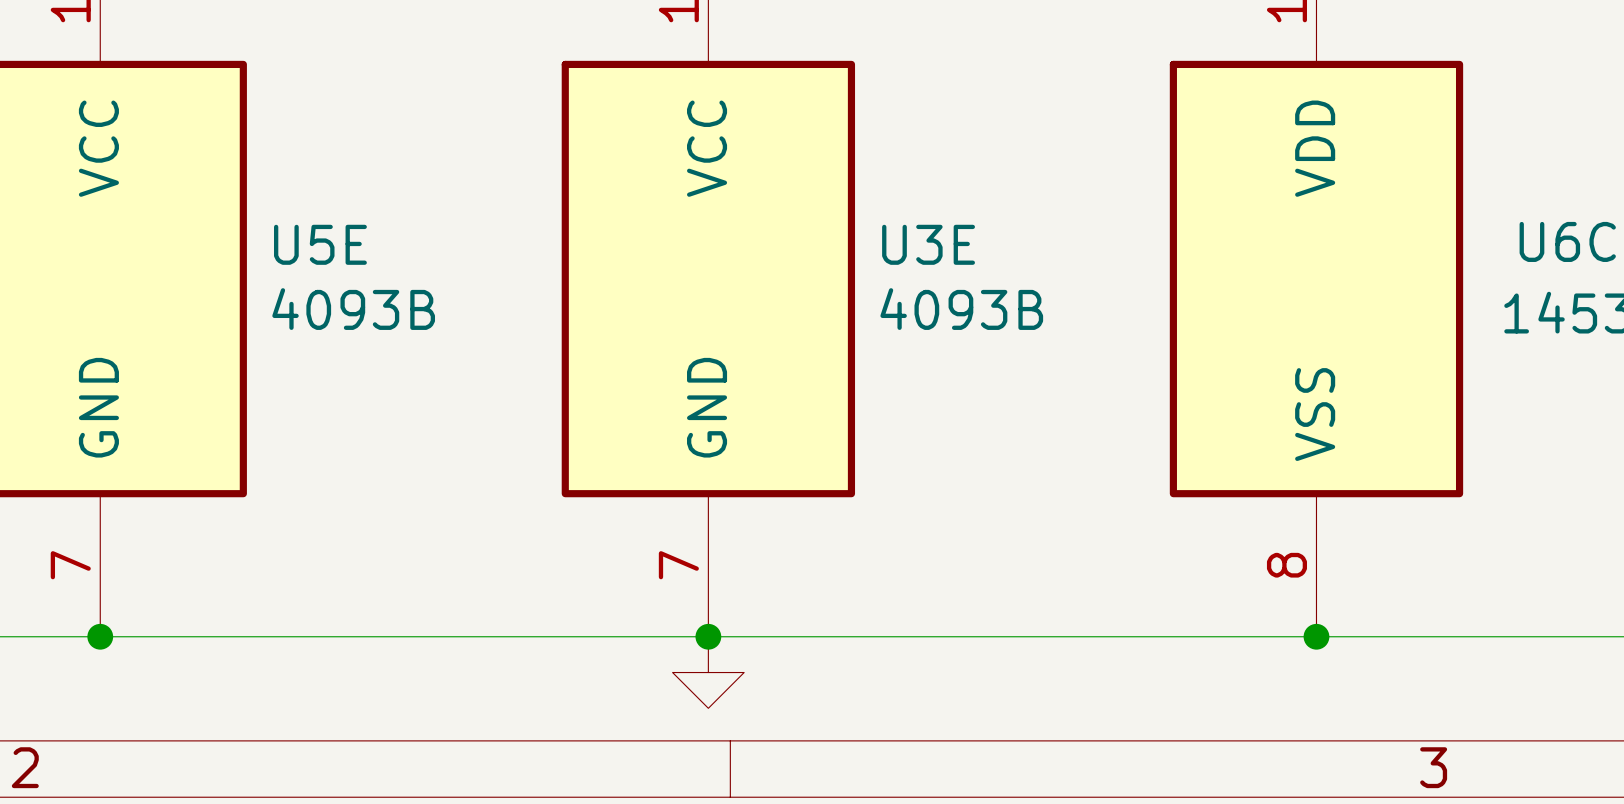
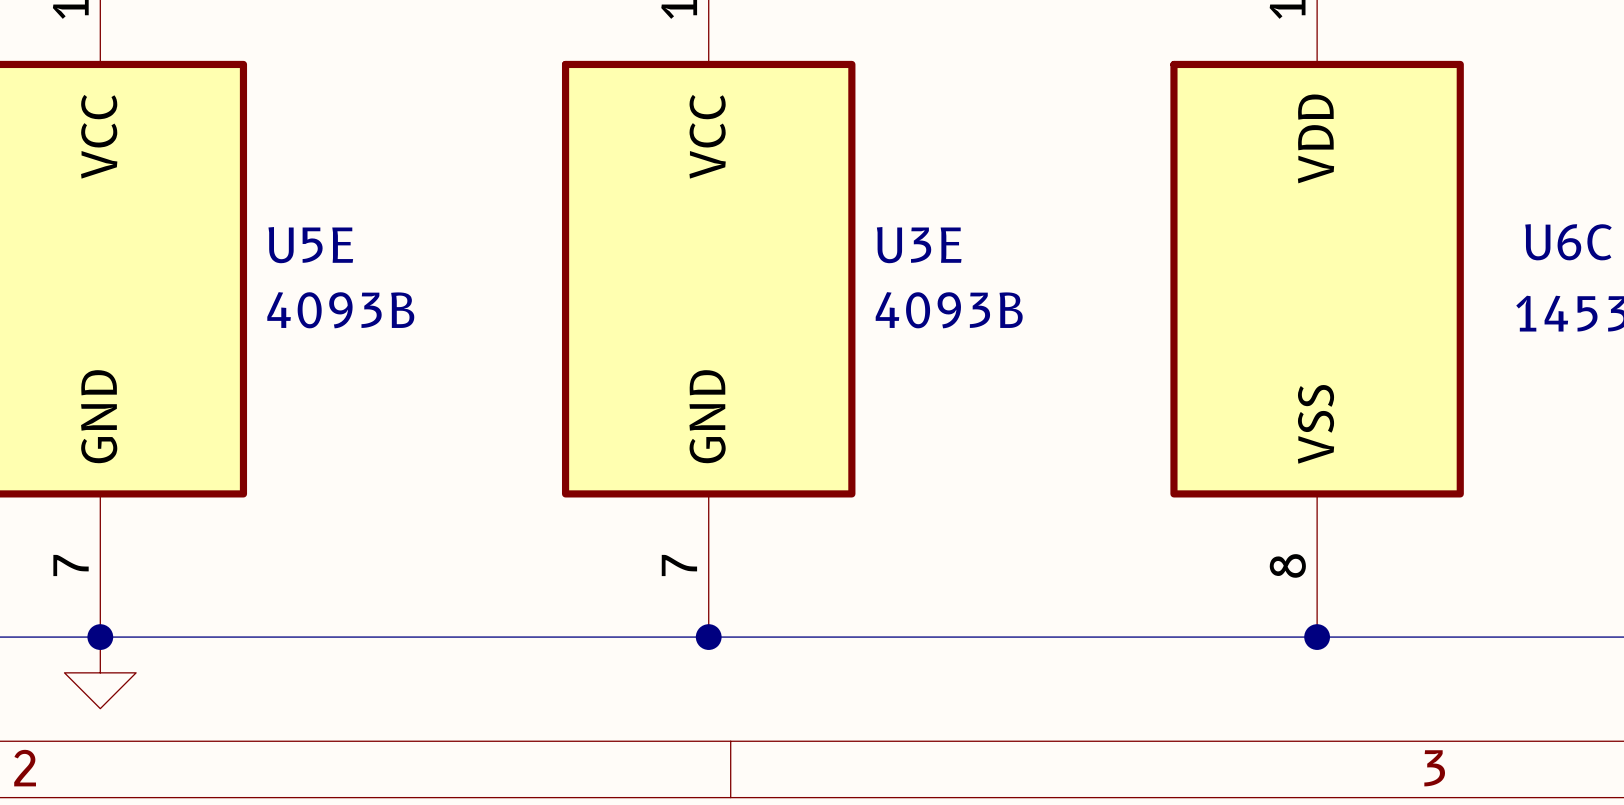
power symbol position: (708, 672) -> (100, 672)

